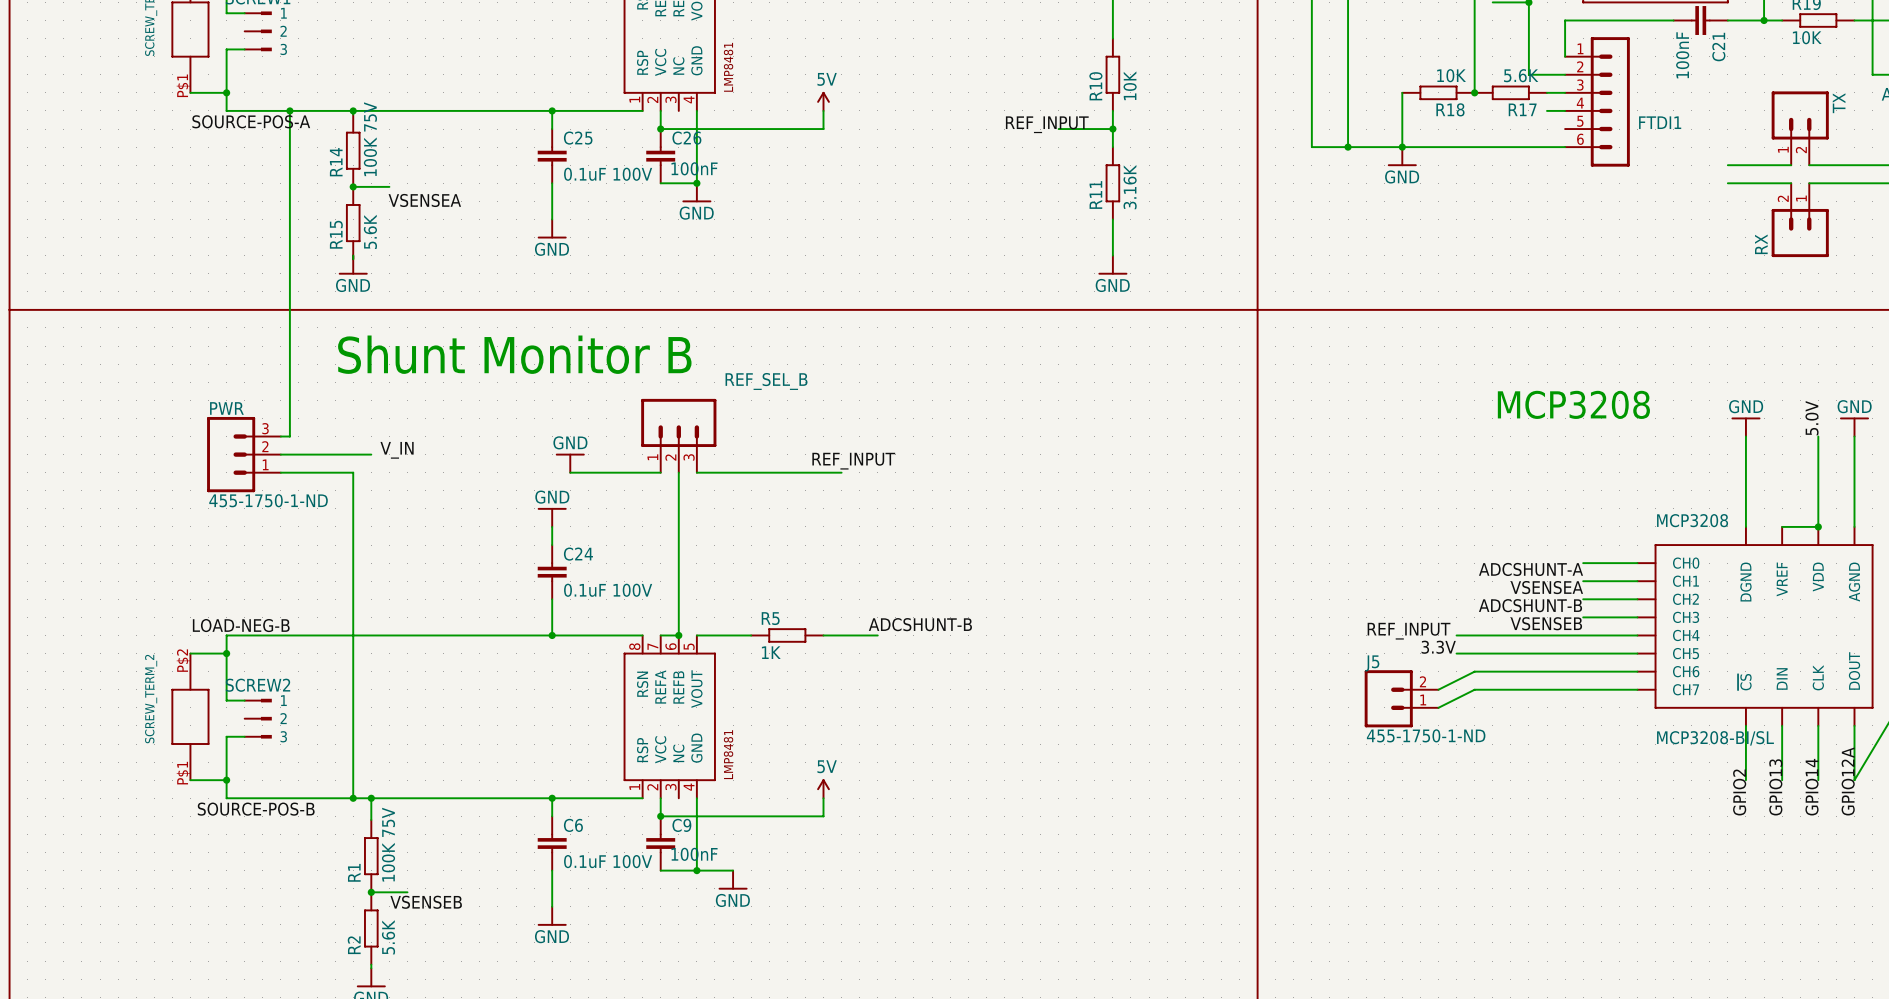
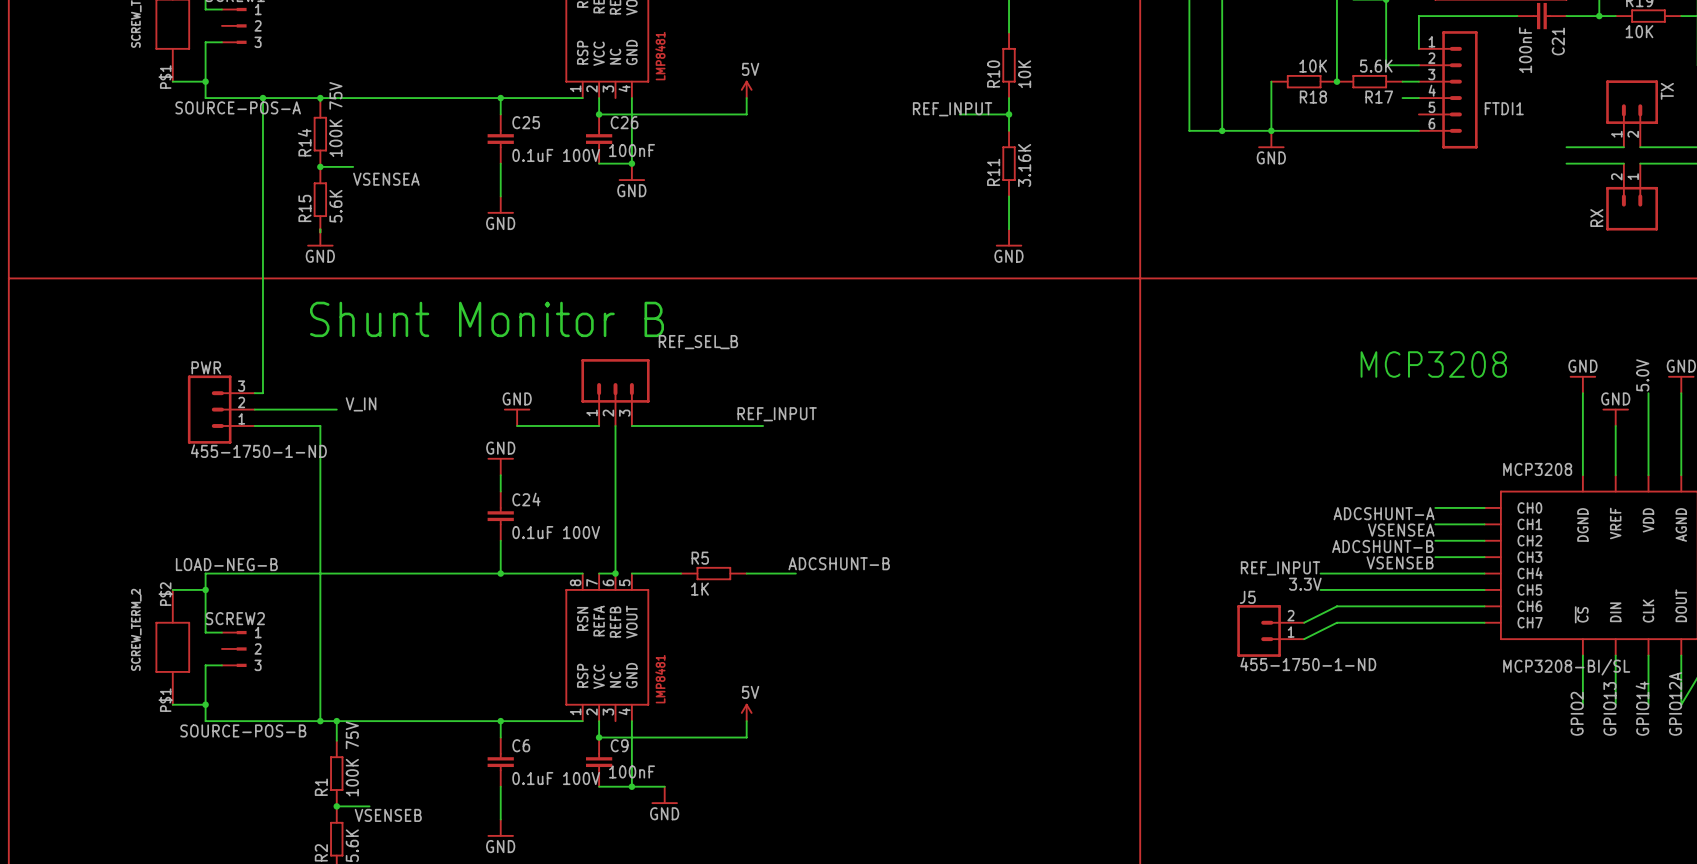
power symbol: none -> GND (1615, 417)
wire: (1782, 526) (1818, 526) -> (1615, 475) (1615, 425)
junction: (1818, 526) -> none

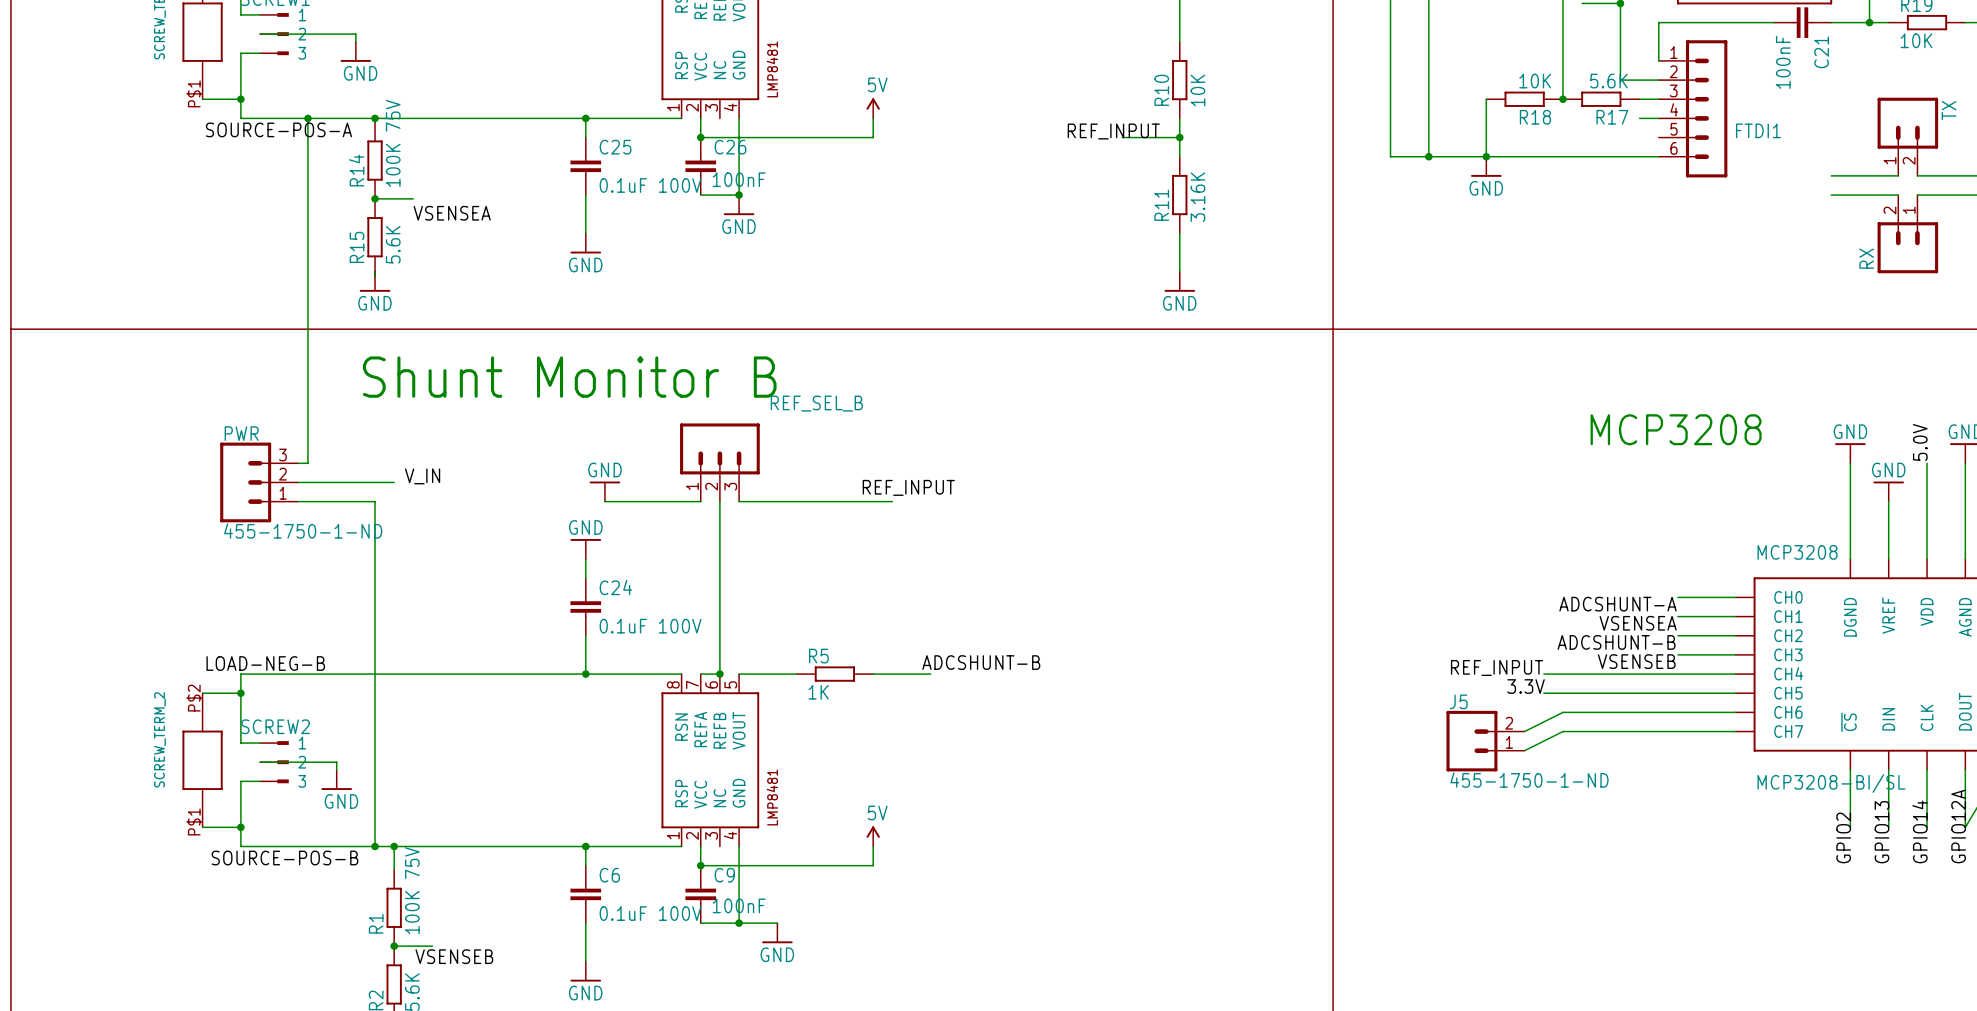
wire: none -> (260, 34) (355, 34) (355, 41)
power symbol: none -> GND (355, 51)
wire: none -> (260, 762) (336, 762) (336, 769)
power symbol: none -> GND (336, 779)

